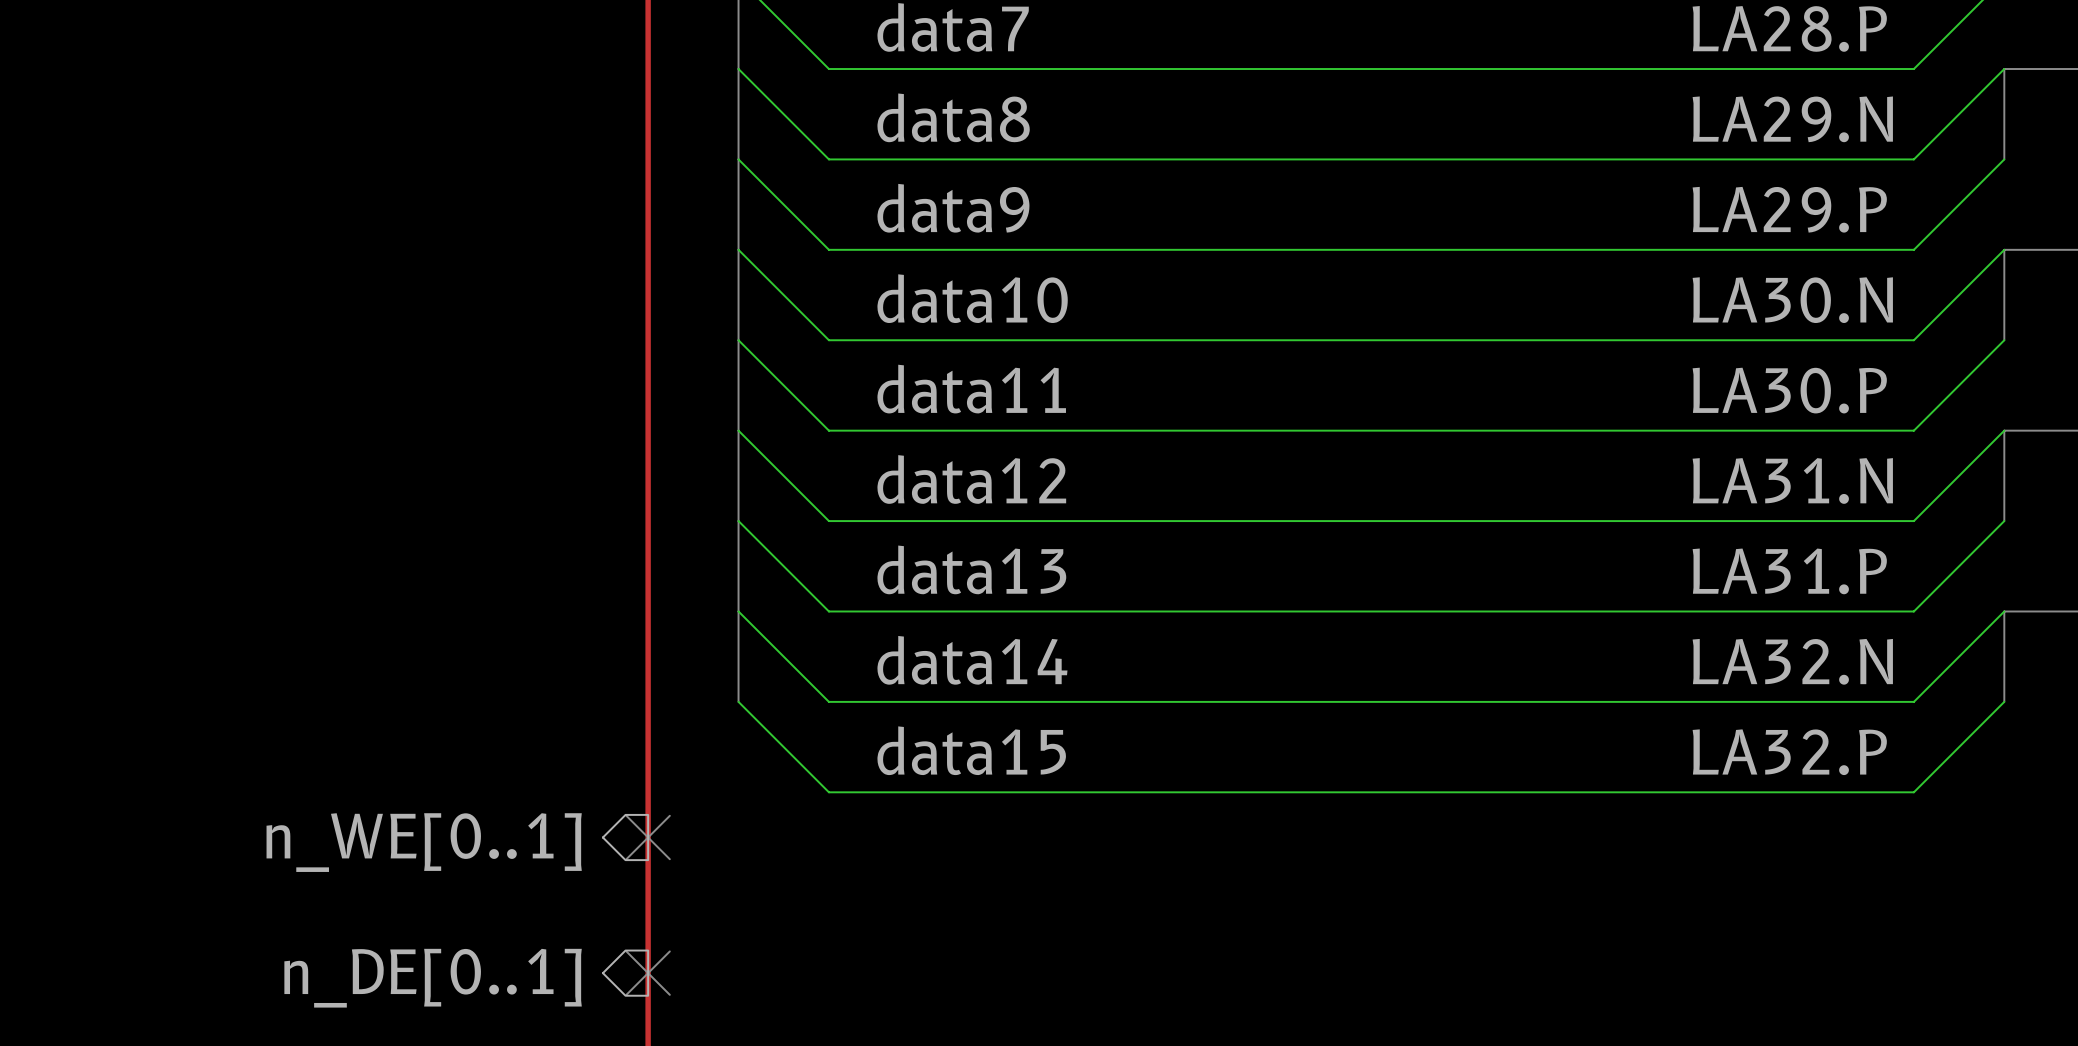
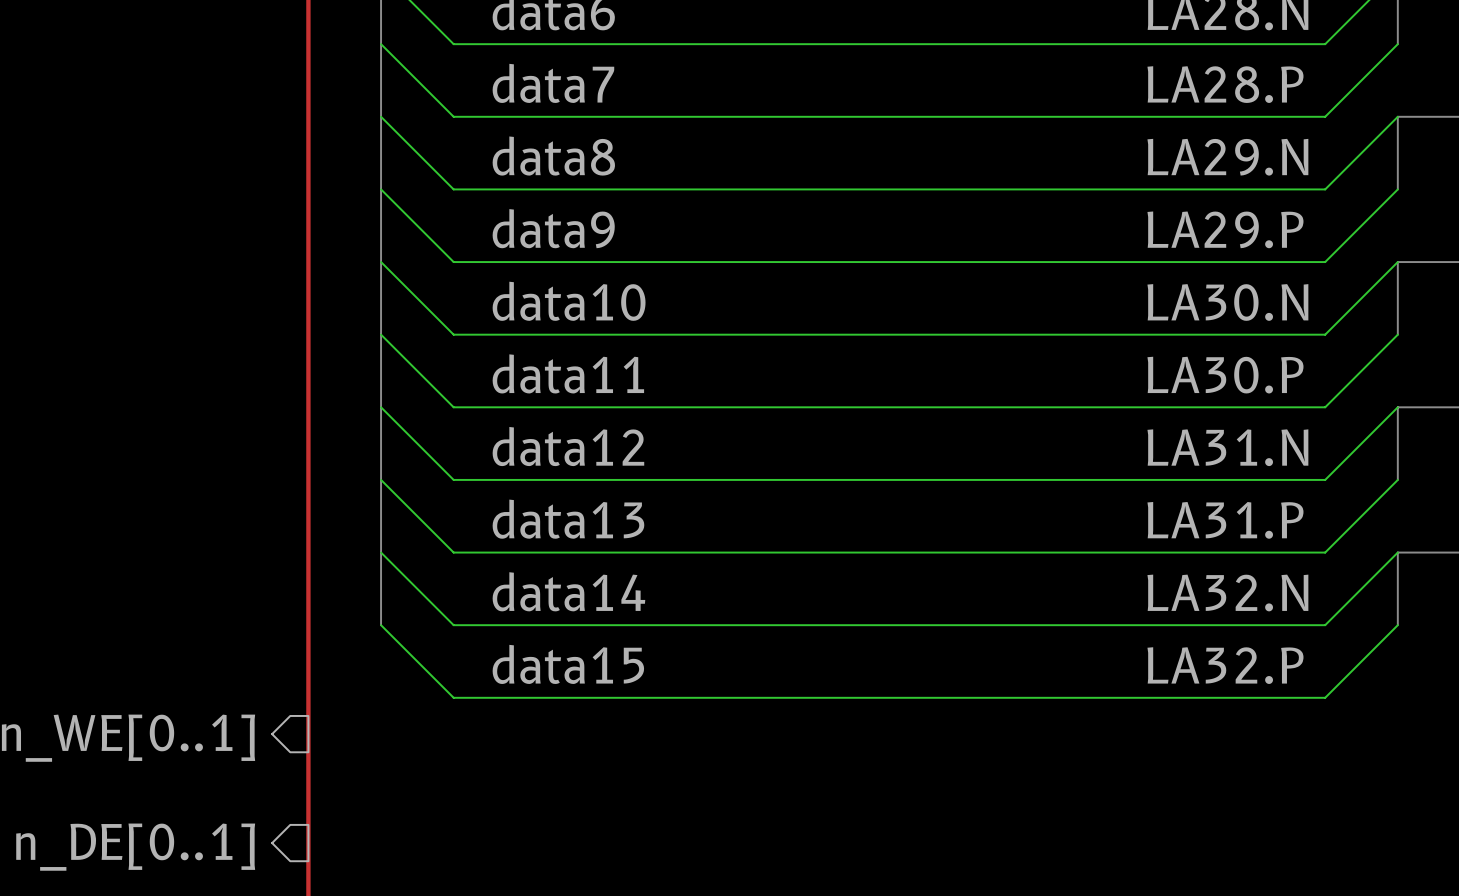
no-connect mark: (648, 837) -> none
no-connect mark: (648, 973) -> none

